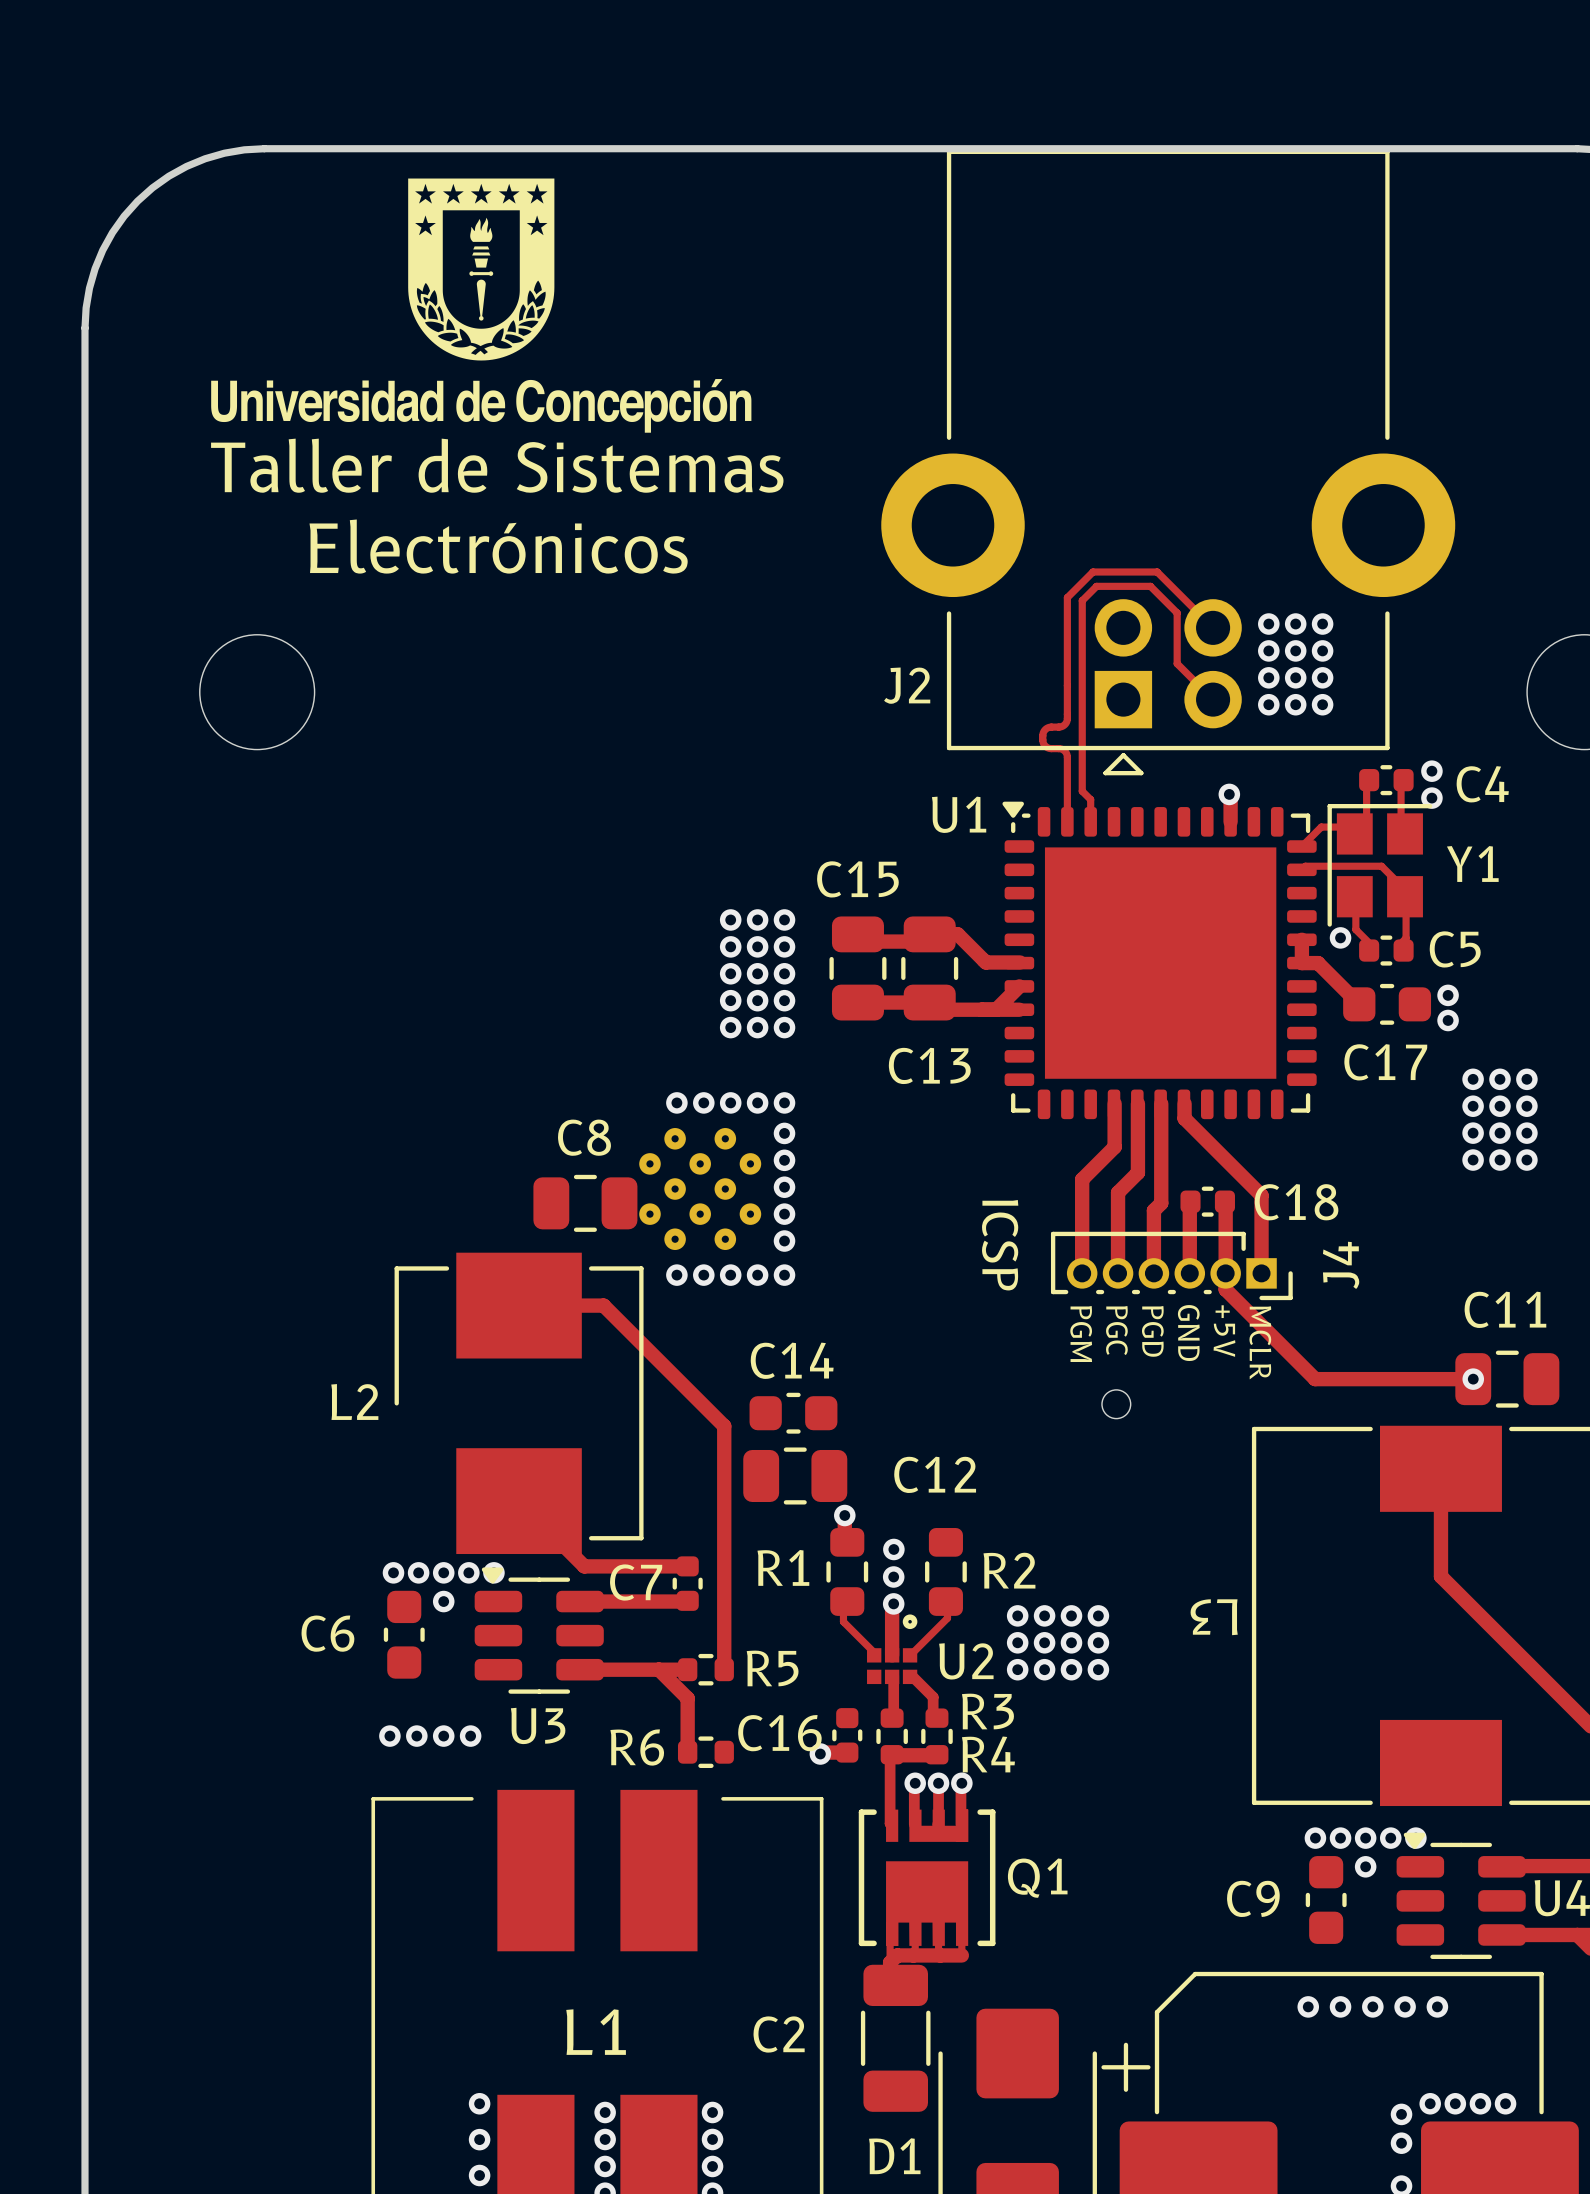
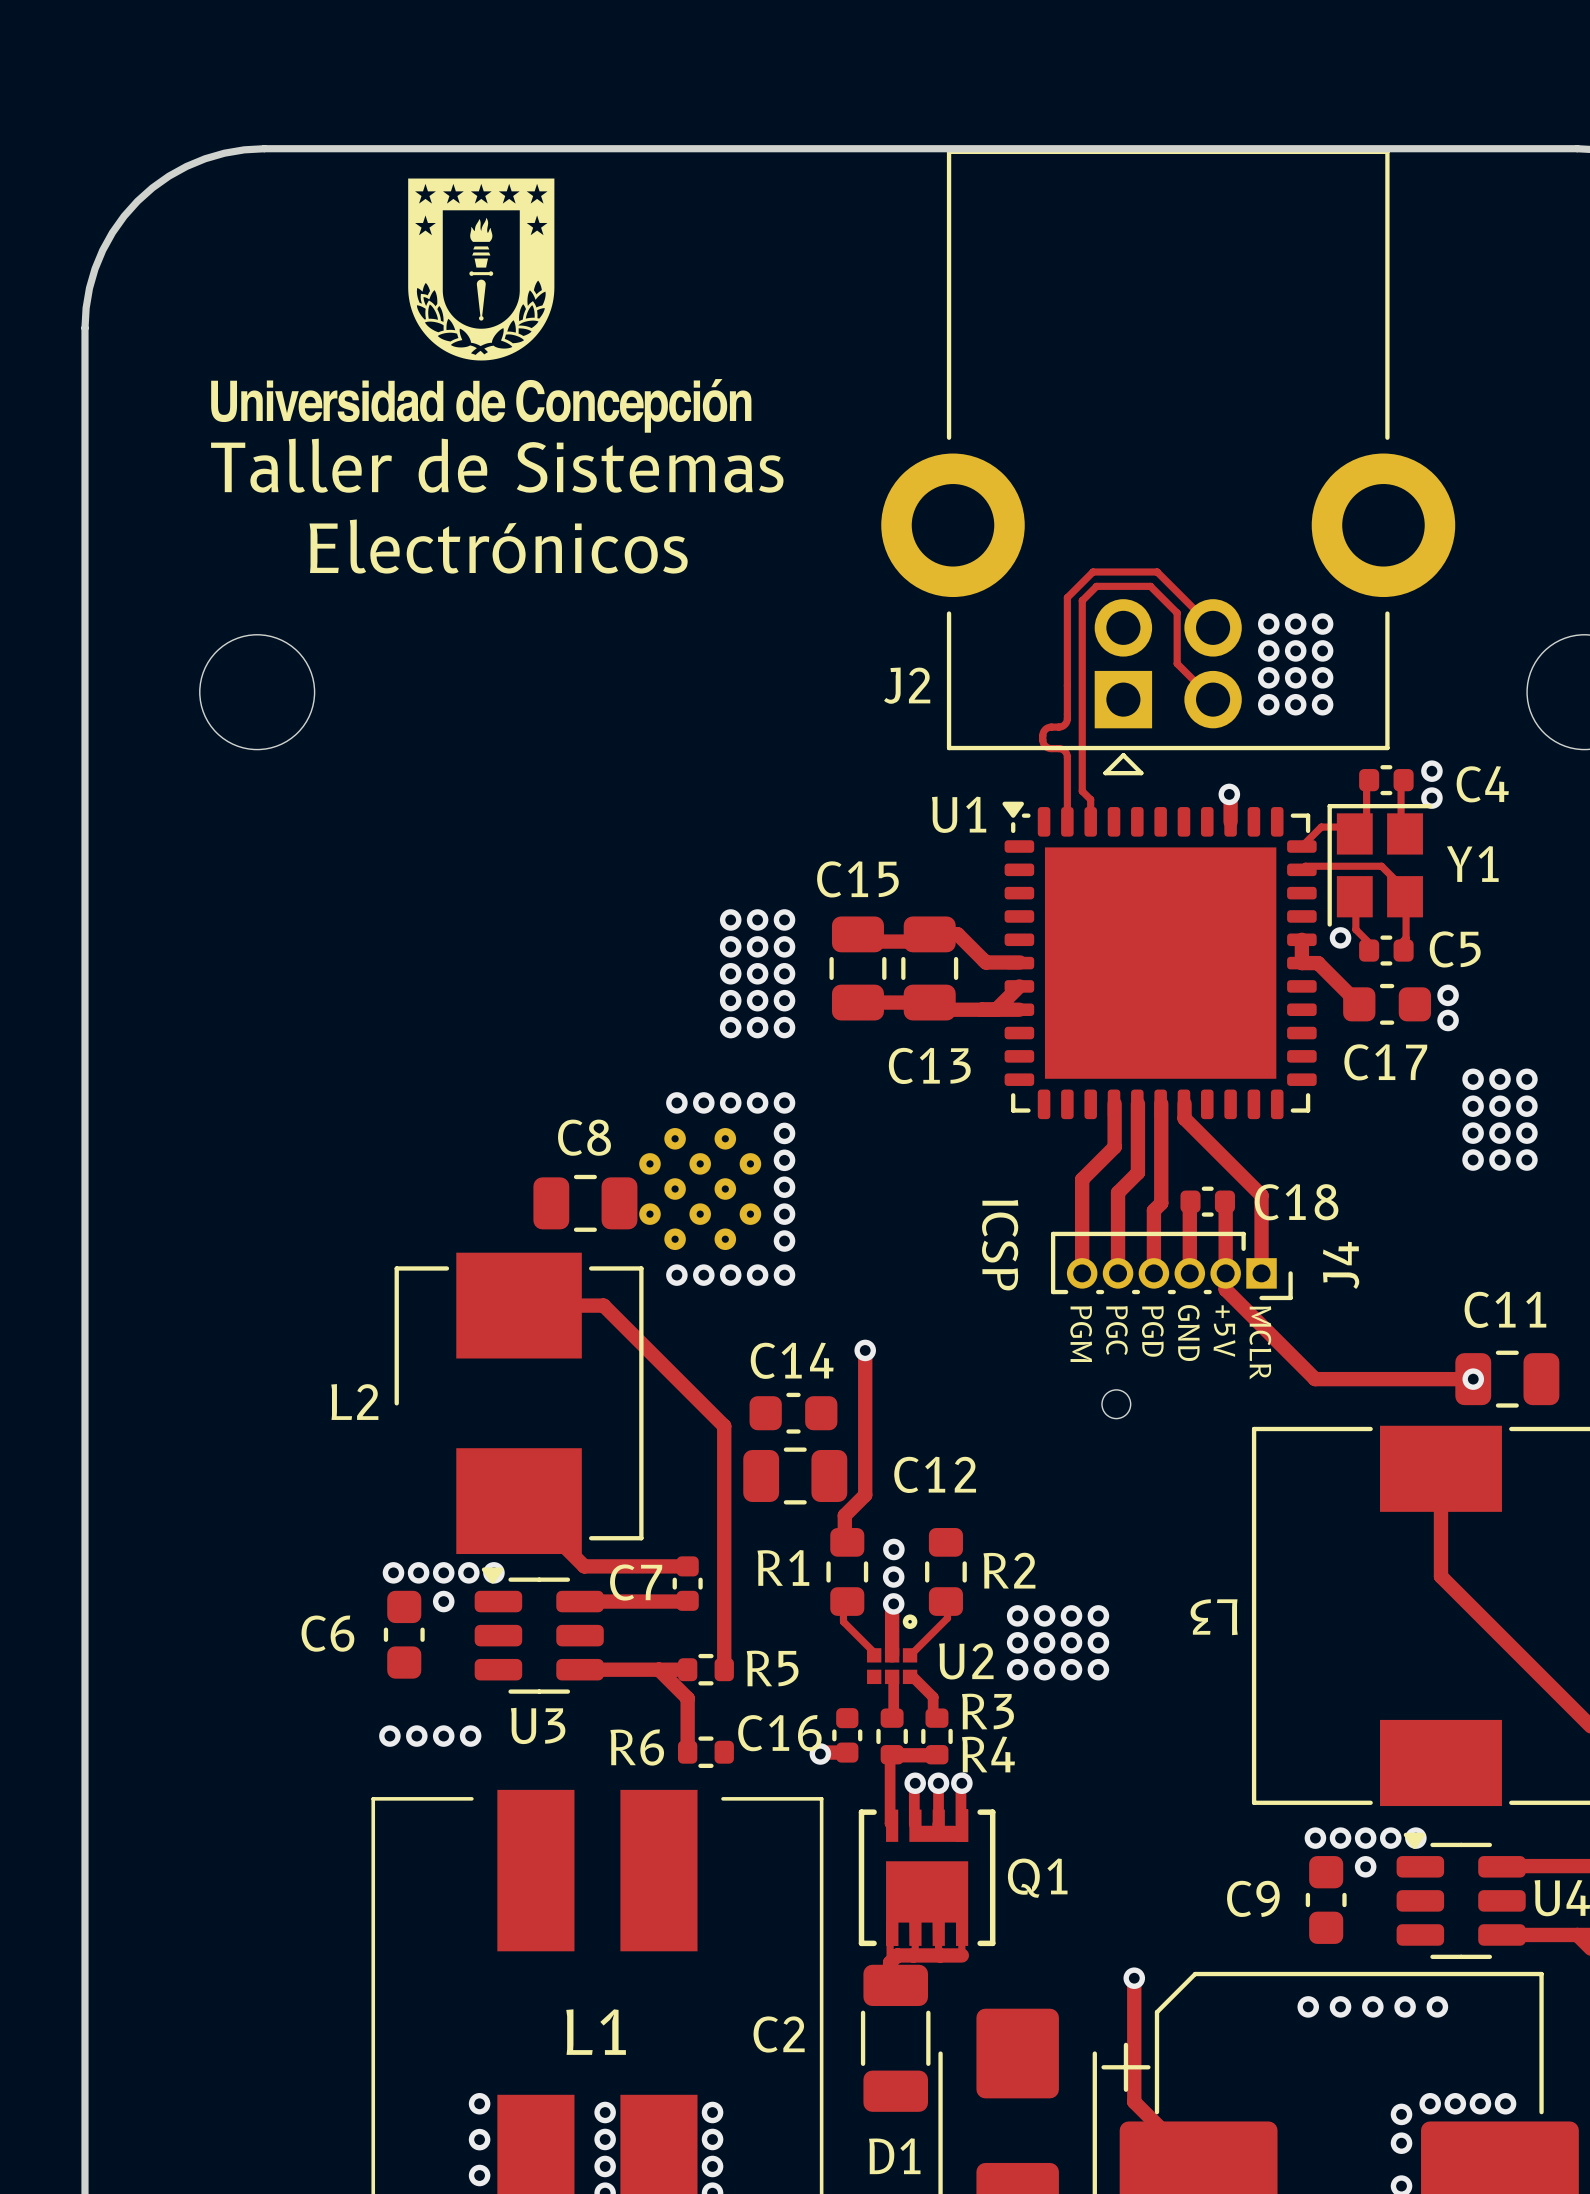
track: none -> (865, 1350) (865, 1495) (844, 1515)
via position: (844, 1515) -> (865, 1350)
track: none -> (1134, 1978) (1134, 2101) (1198, 2166)
via: none -> (1134, 1978)

